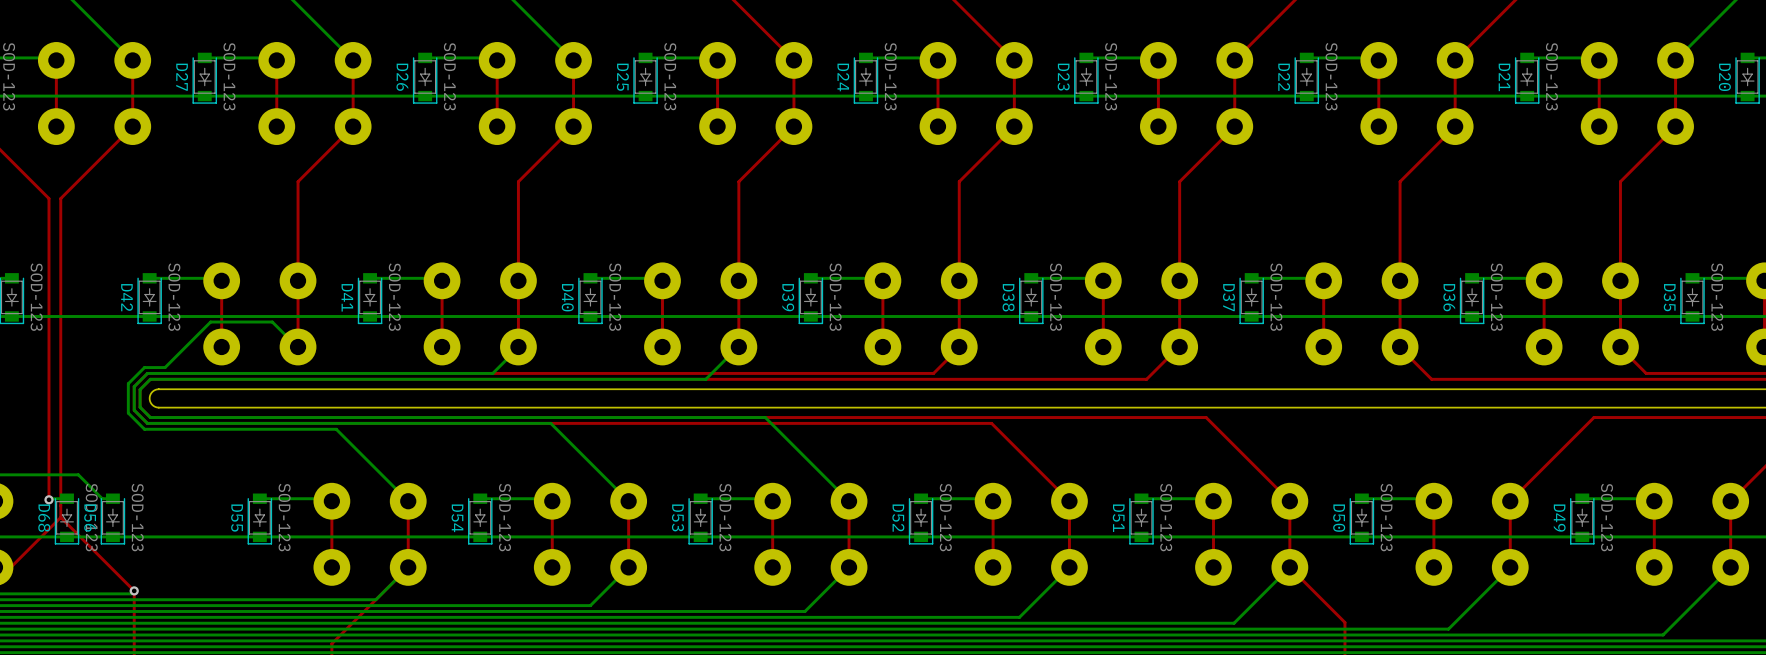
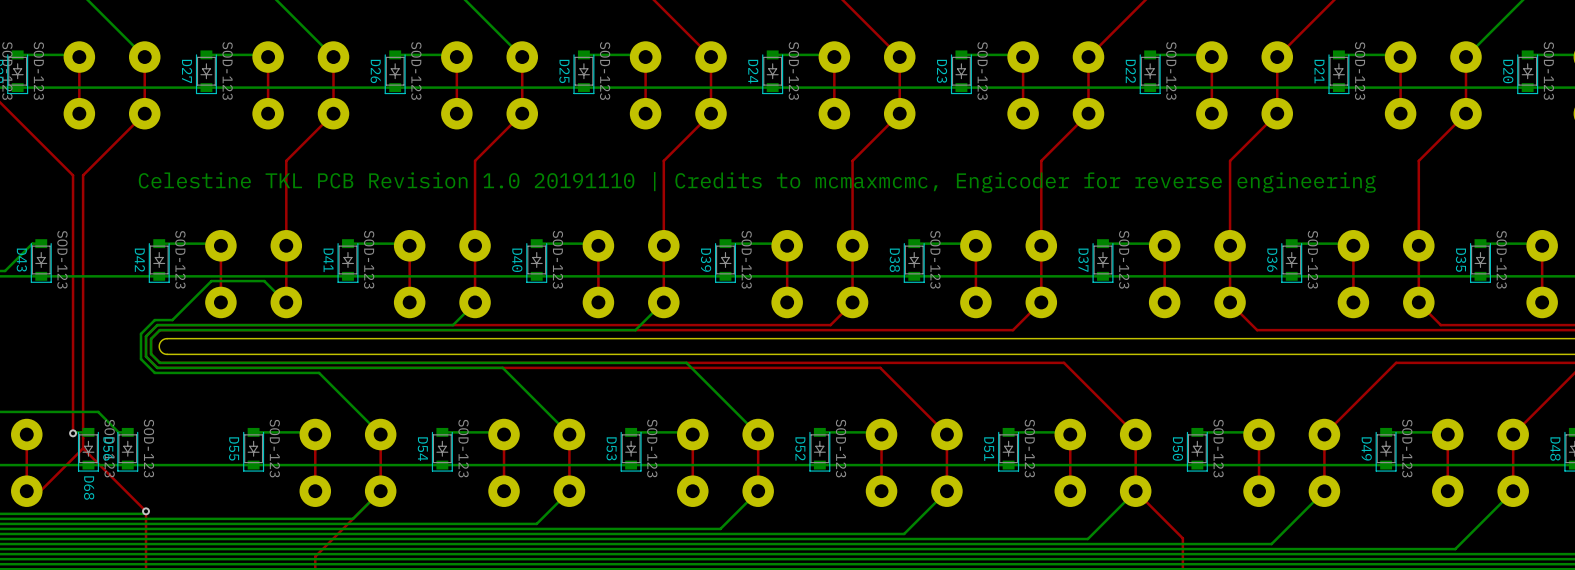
text: none -> Celestine TKL PCB Revision 1.0 20191110 | Credits to mcmaxmcmc, Engicoder for reverse engineering (757, 182)
D68 name position: D68 (44, 518) -> D68 (89, 488)

